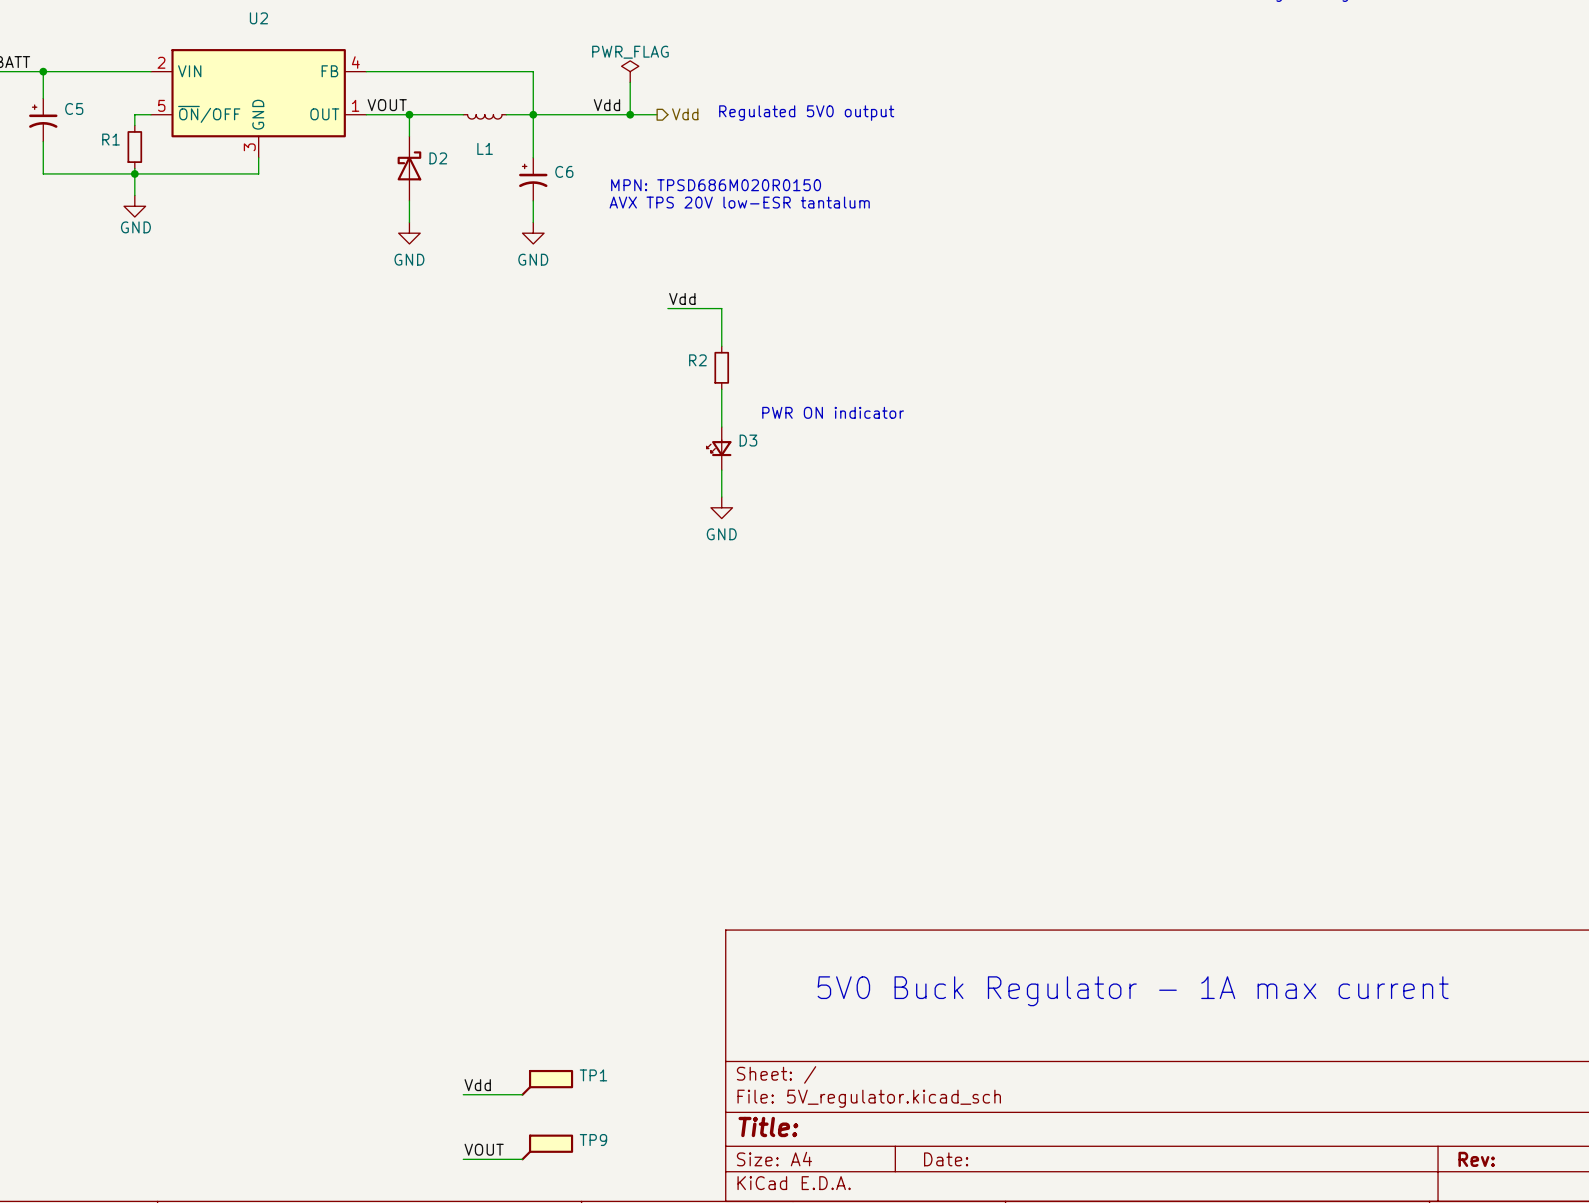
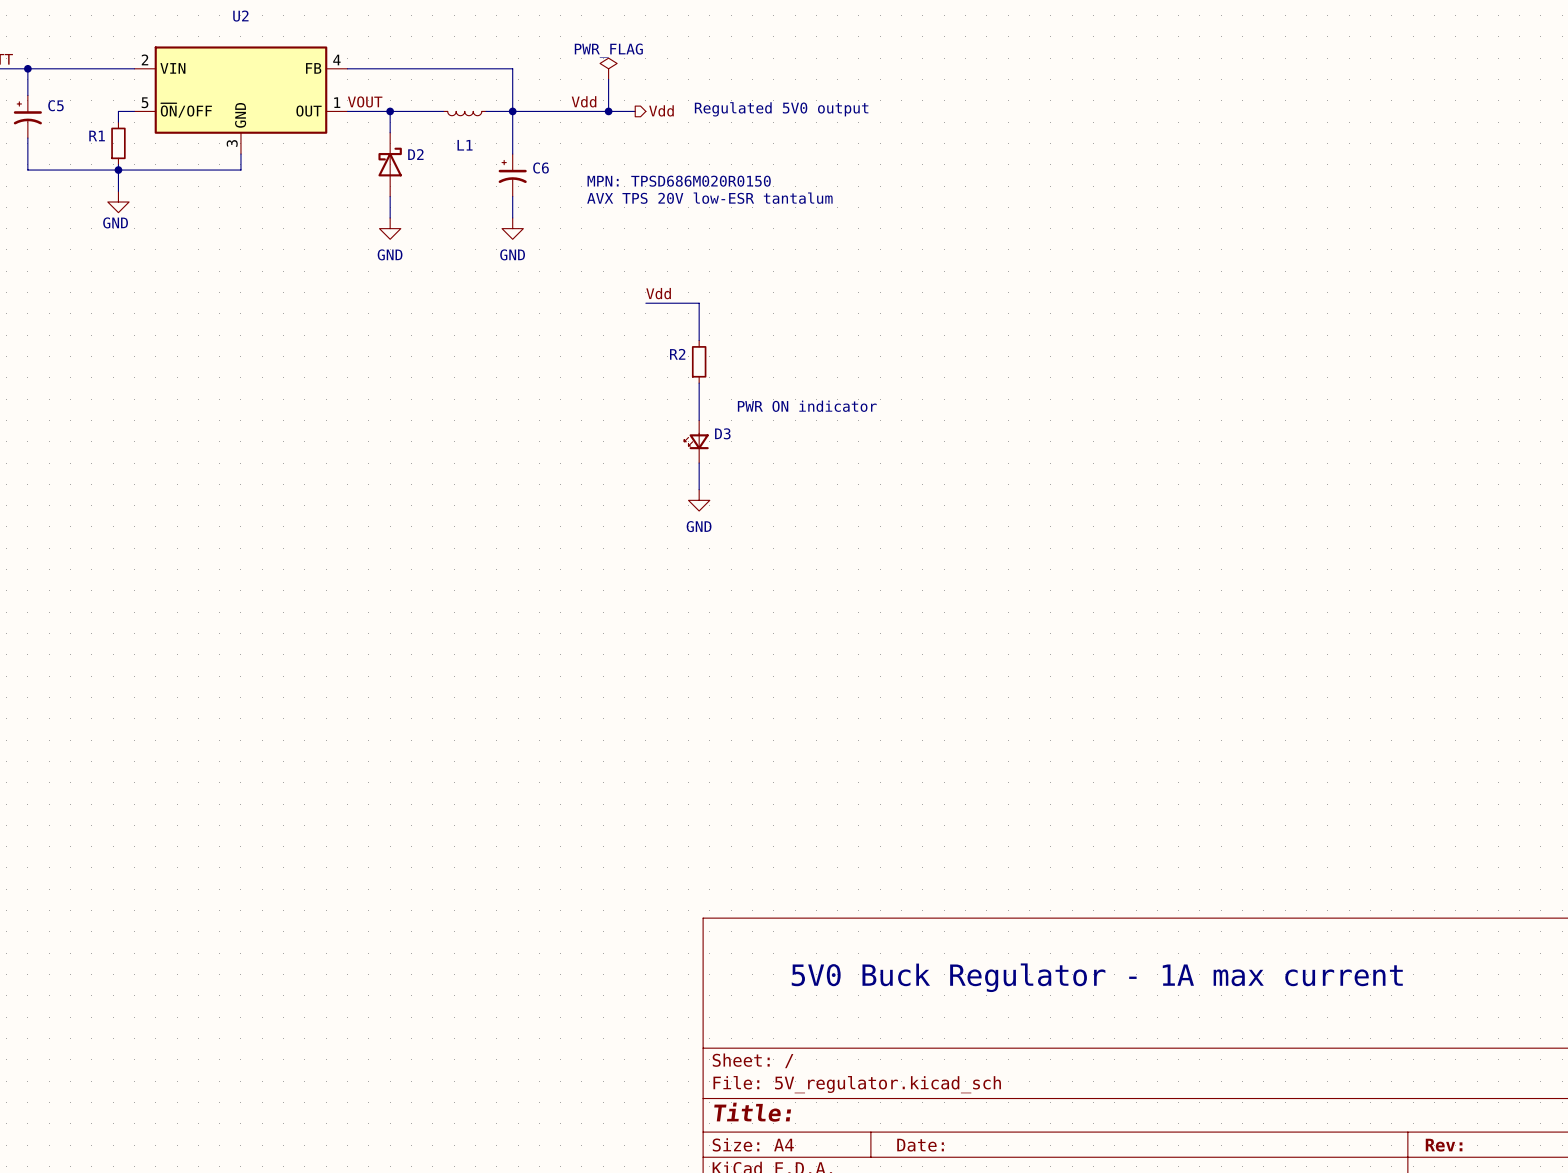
TP1: (547, 1082) -> none
label: Vdd (477, 1085) -> none
wire: (463, 1094) (522, 1094) -> none
TP9: (547, 1147) -> none
label: VOUT (484, 1149) -> none
wire: (463, 1159) (522, 1159) -> none

